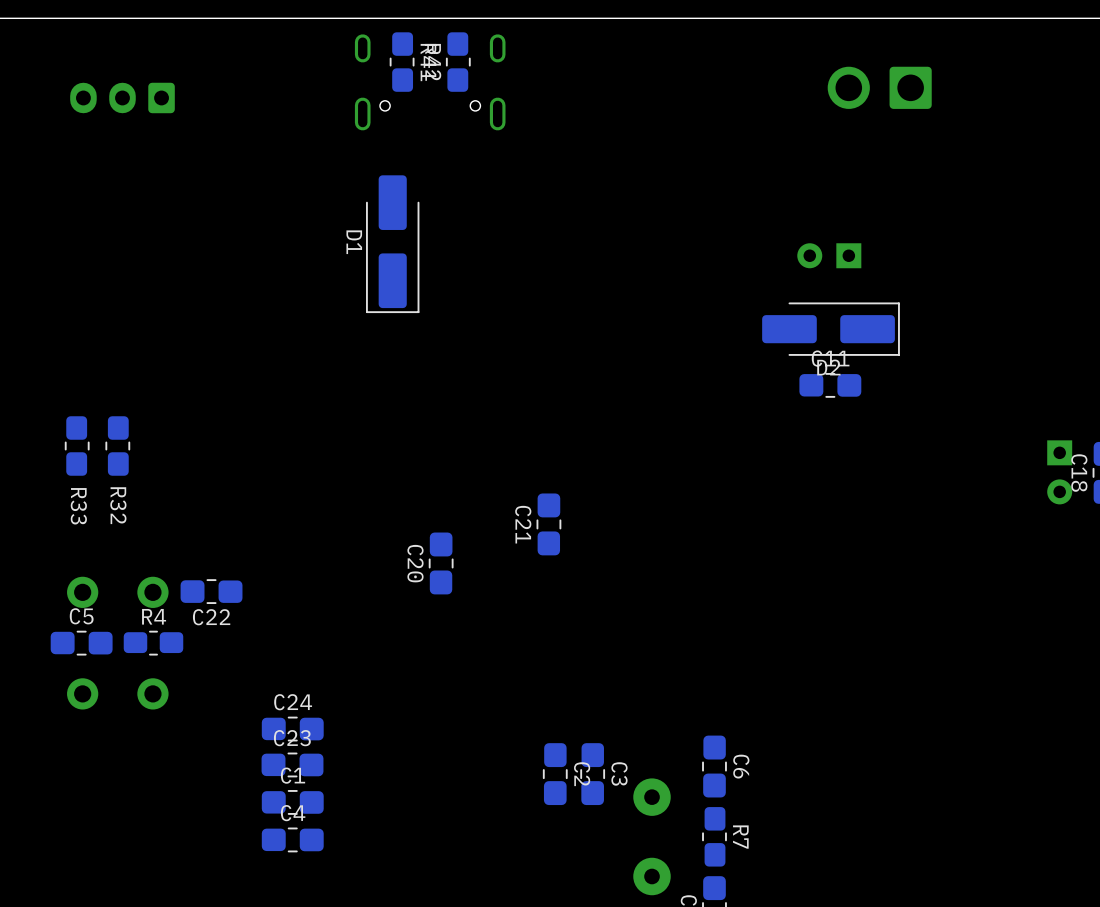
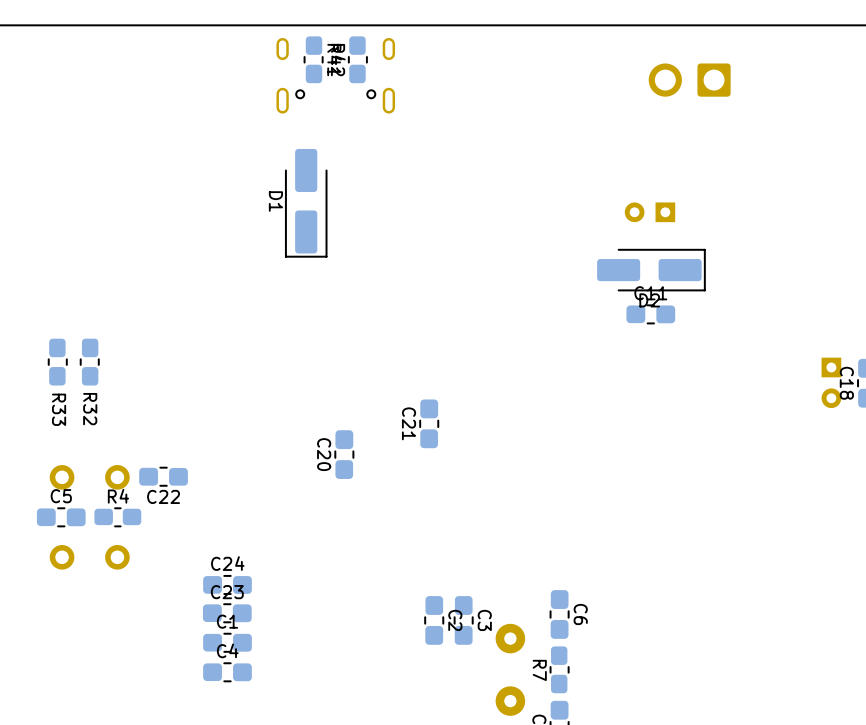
part: (122, 97) -> none
R7 rotation: 0° (714, 836) -> 180° (559, 669)

